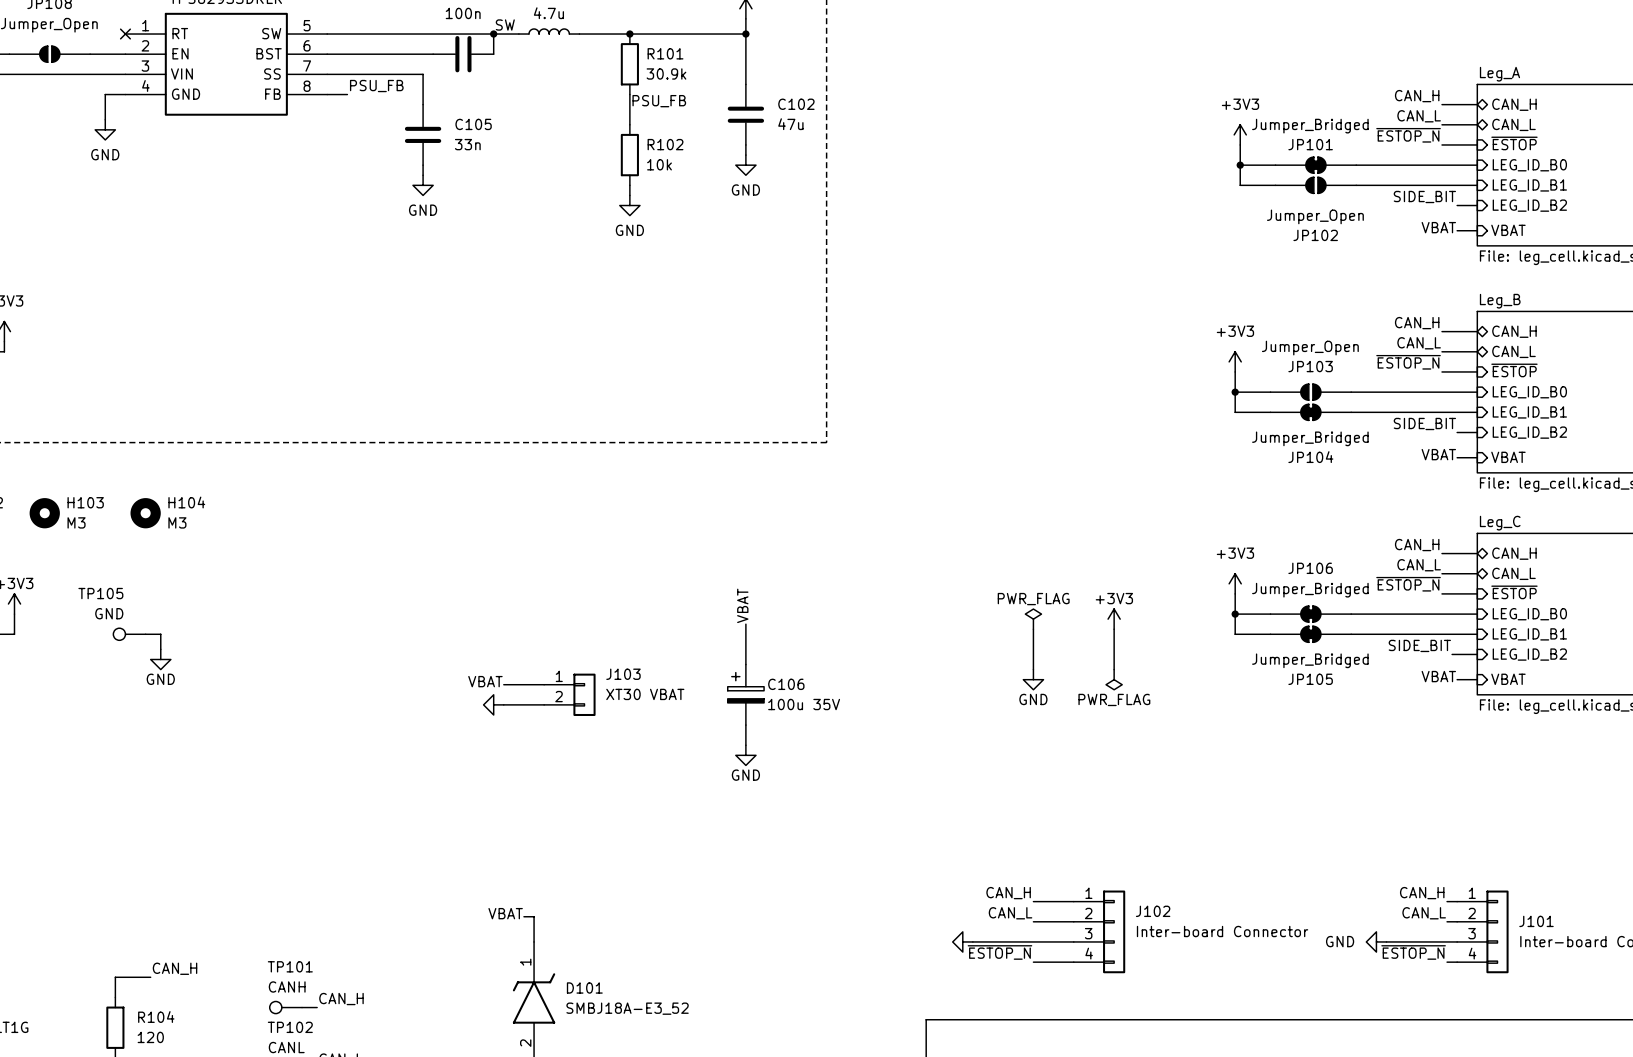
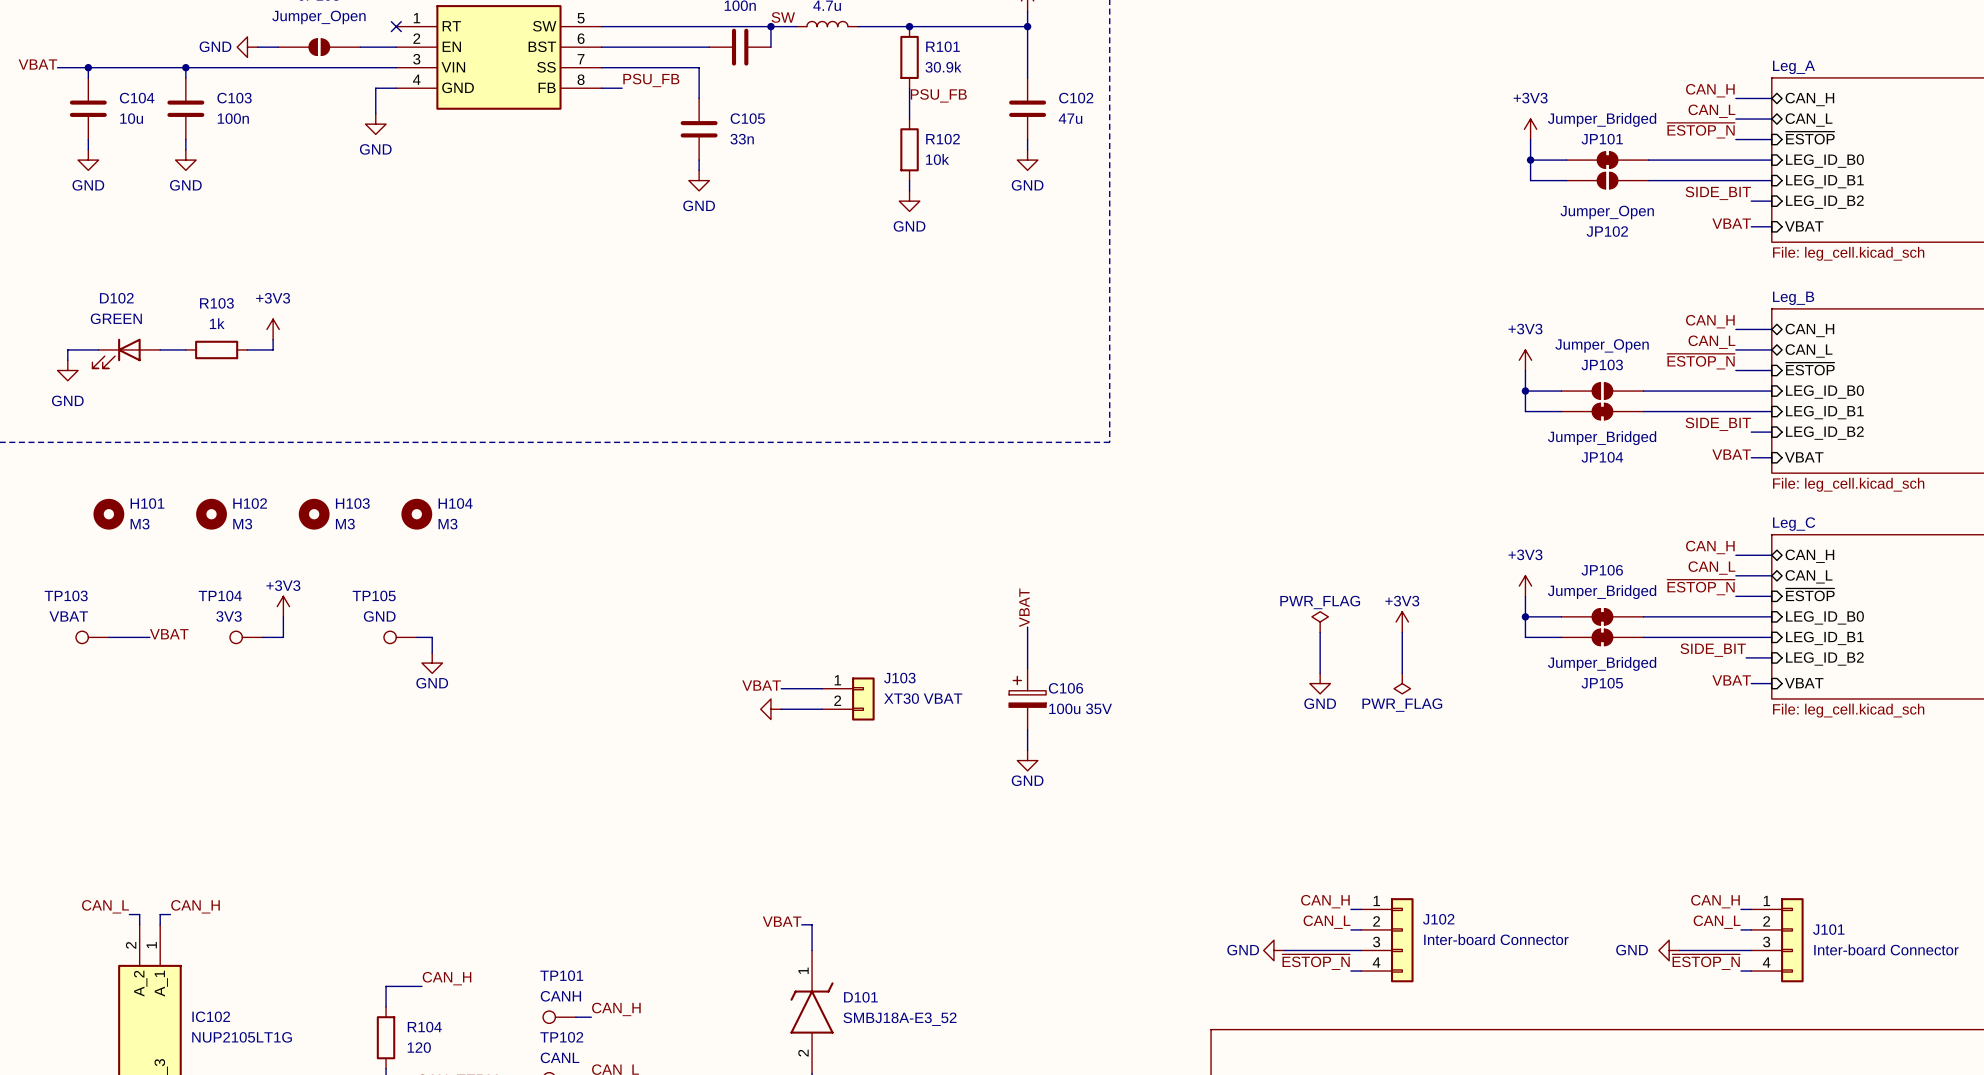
label position: CAN_H (1008, 893) -> CAN_H (1325, 901)
wire: (1033, 901) (1063, 901) -> none
label position: CAN_L (1010, 913) -> CAN_L (1327, 922)
wire: (1033, 921) (1063, 921) -> none
power symbol: (962, 941) -> none
power symbol: none -> GND (1273, 950)
label position: ~{ESTOP_N} (999, 952) -> ~{ESTOP_N} (1316, 962)
wire: (1033, 962) (1063, 962) -> none

